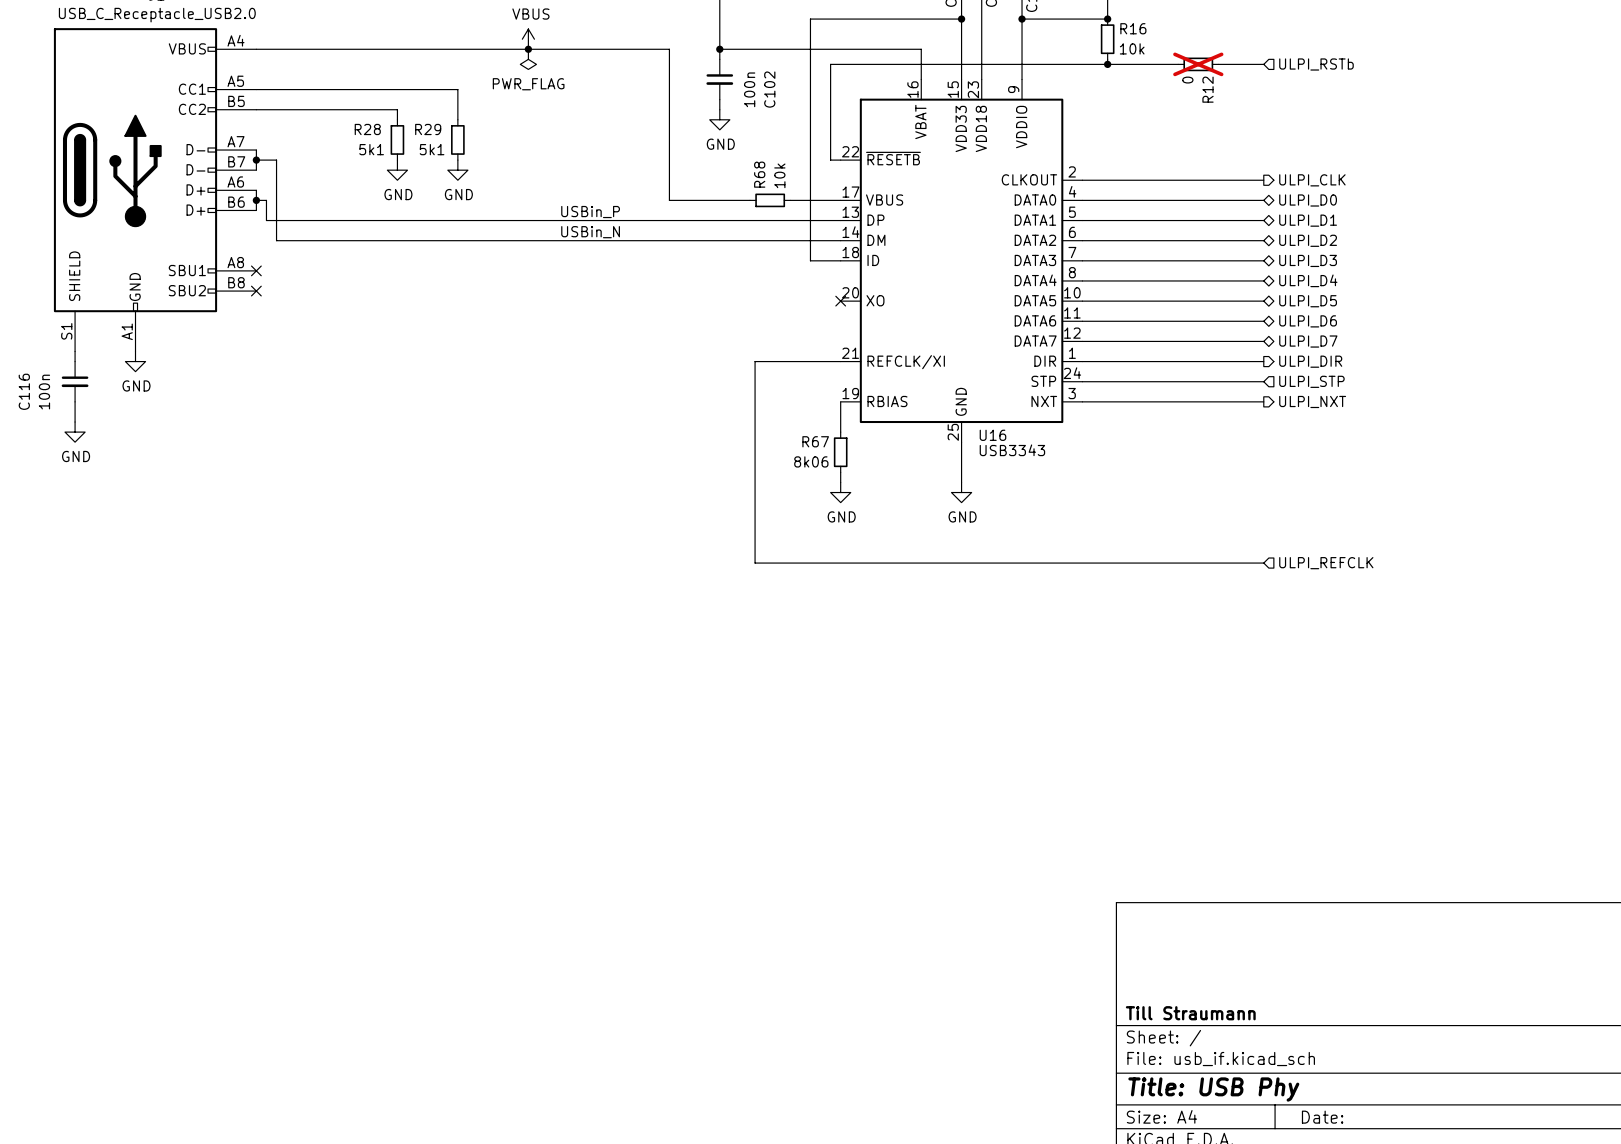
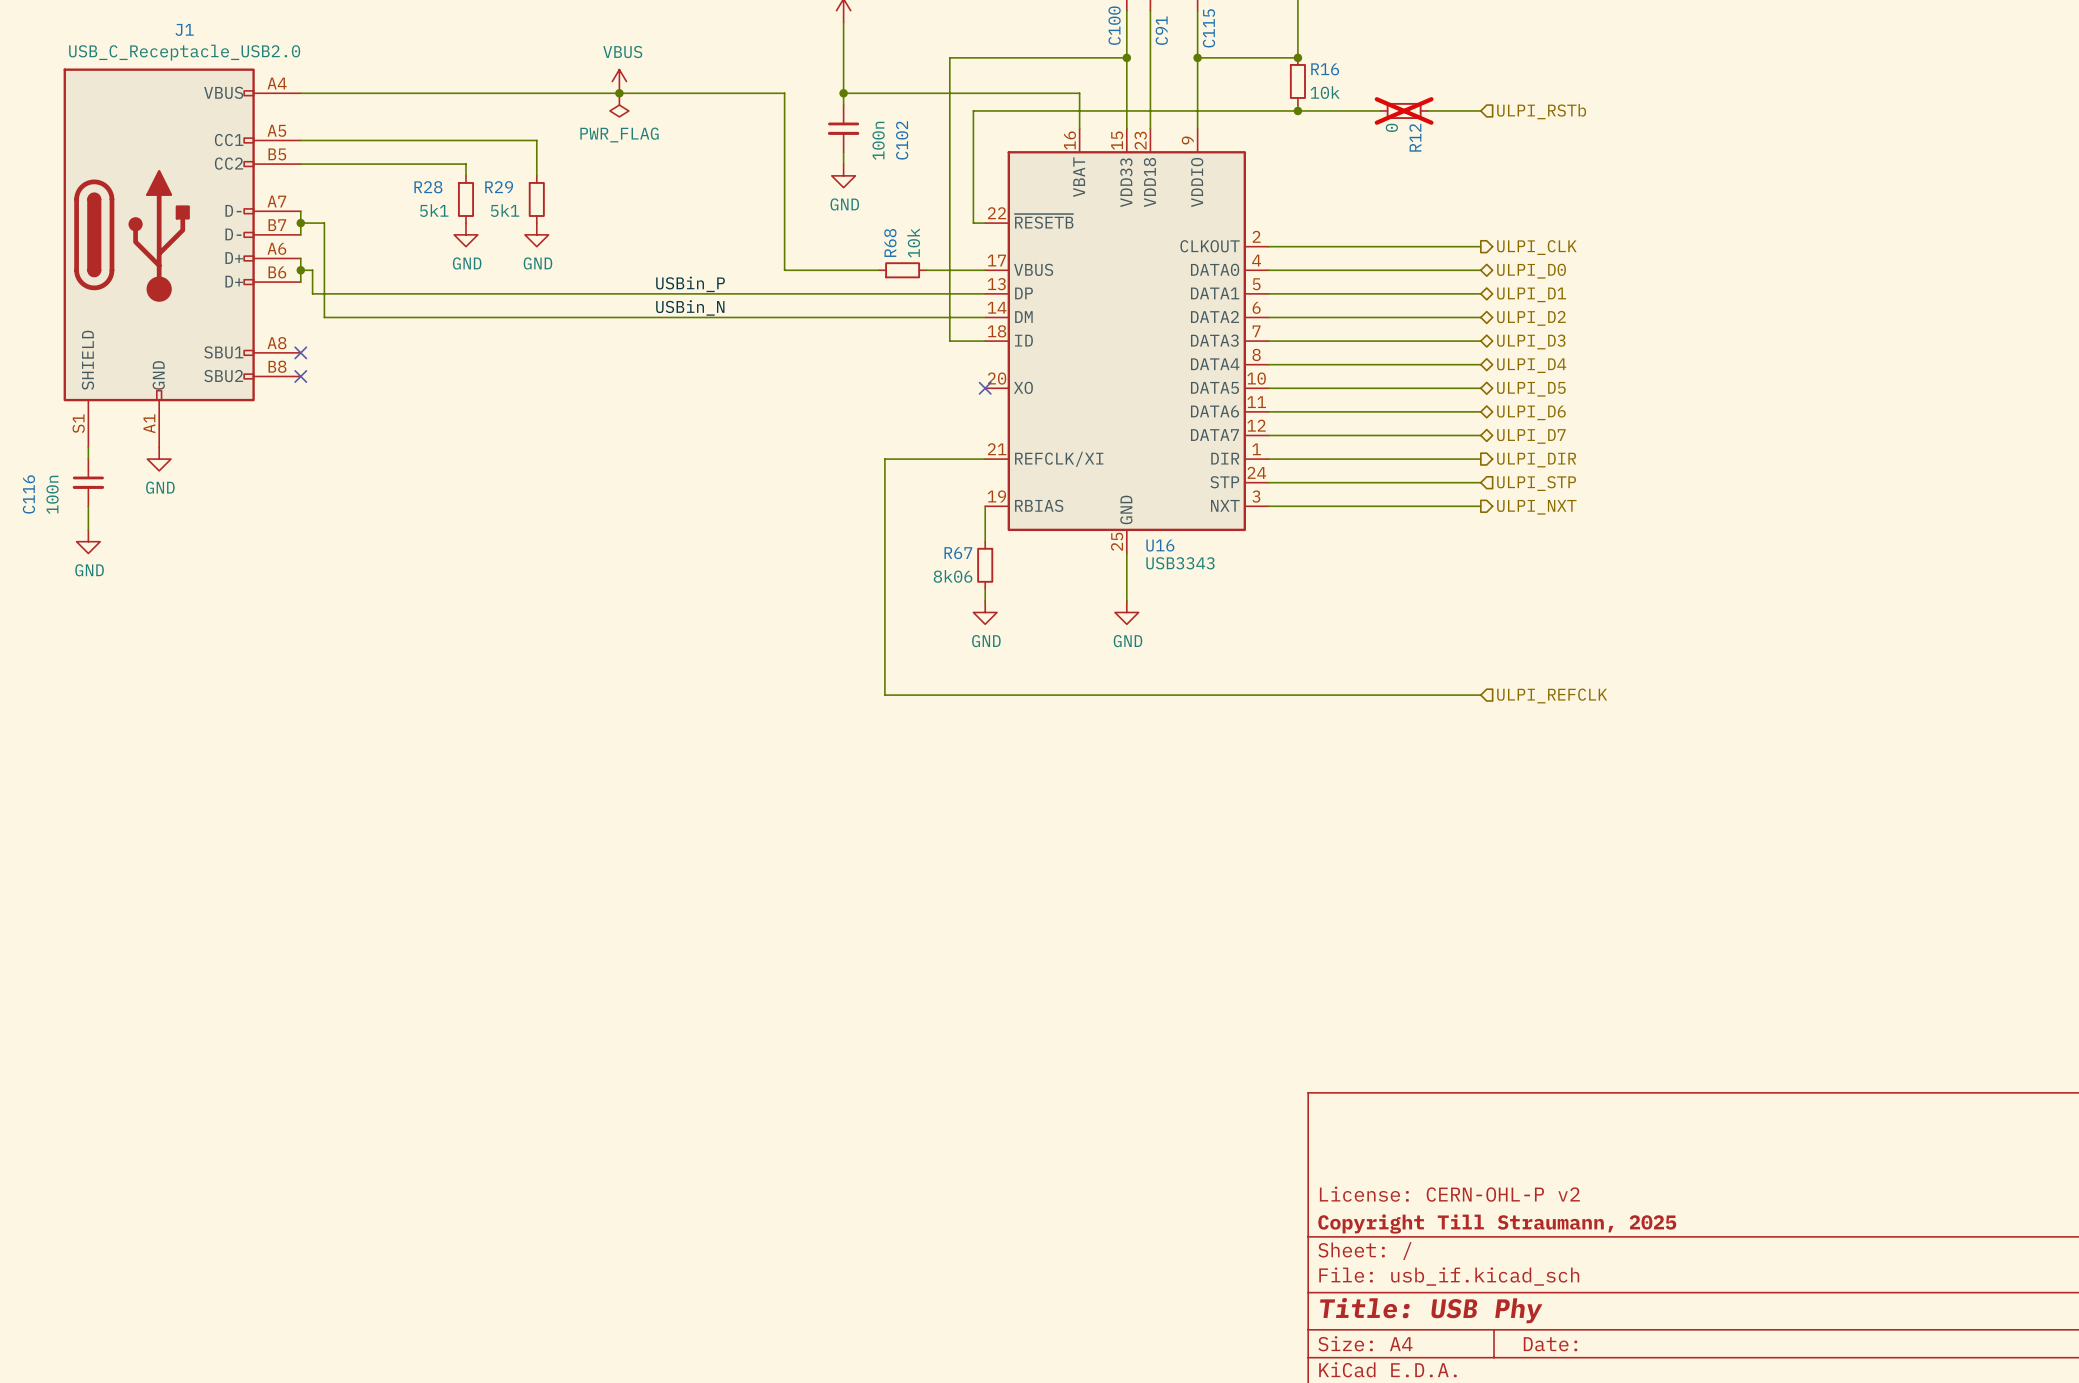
title block: none -> License: CERN-OHL-P v2 (1449, 1194)
title block: Till Straumann (1190, 1013) -> Copyright Till Straumann, 2025 (1497, 1224)

